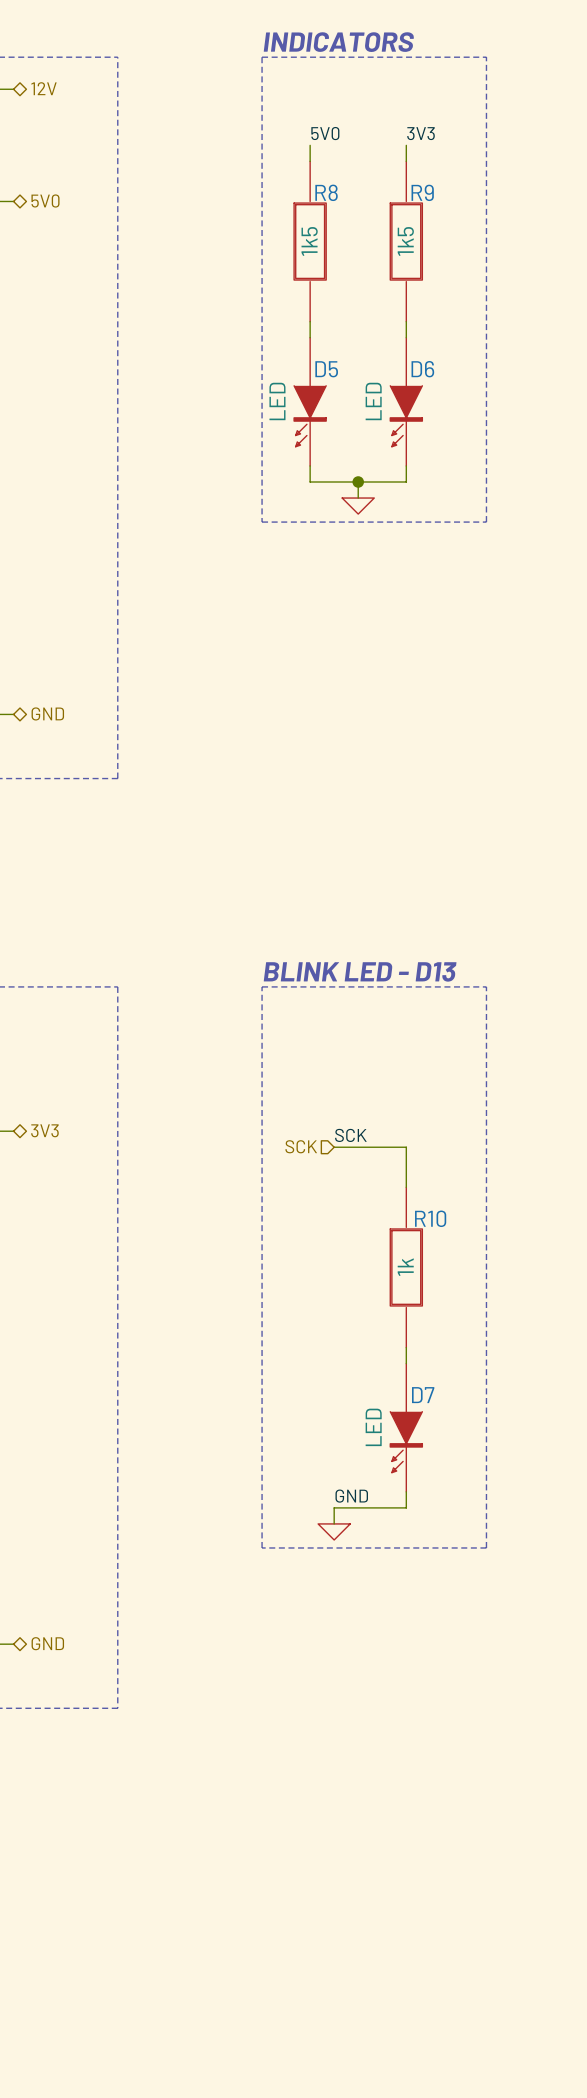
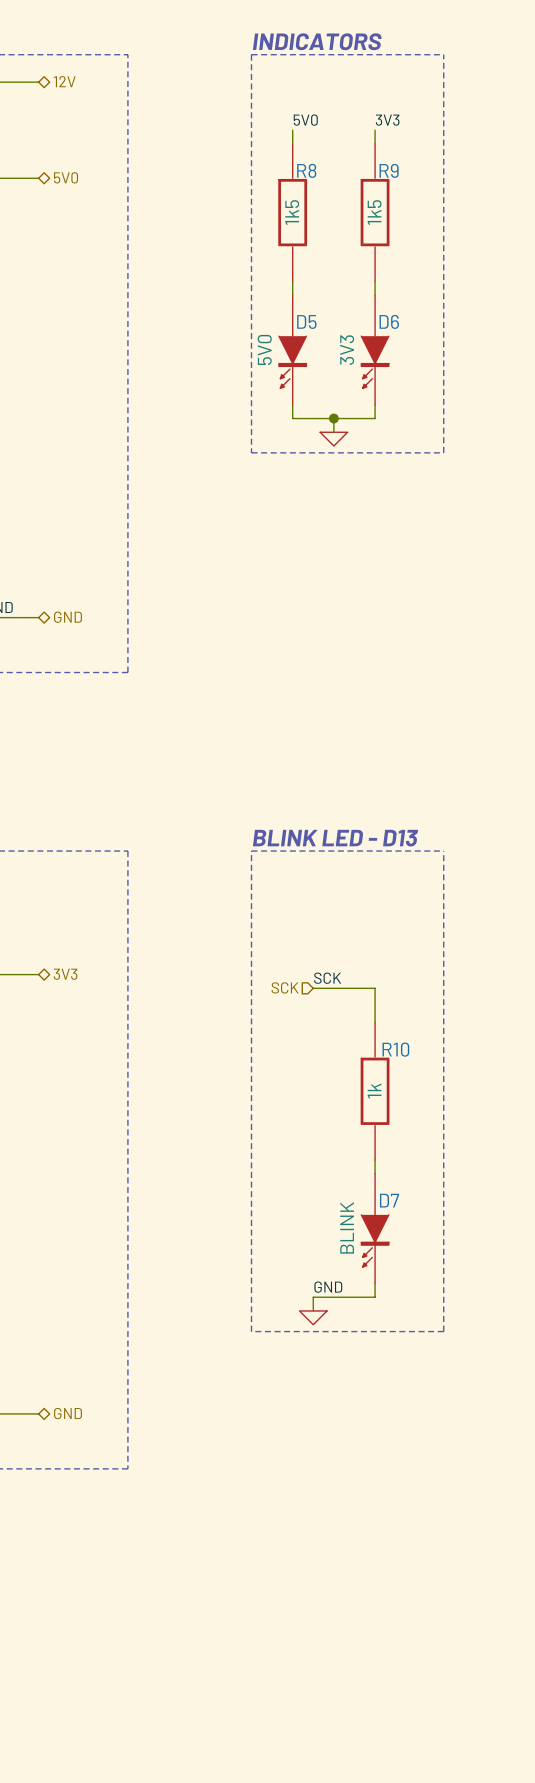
D5 value: LED (277, 401) -> 5V0 (264, 349)
D6 value: LED (373, 401) -> 3V3 (347, 350)
D7 value: LED (373, 1427) -> BLINK (347, 1227)

